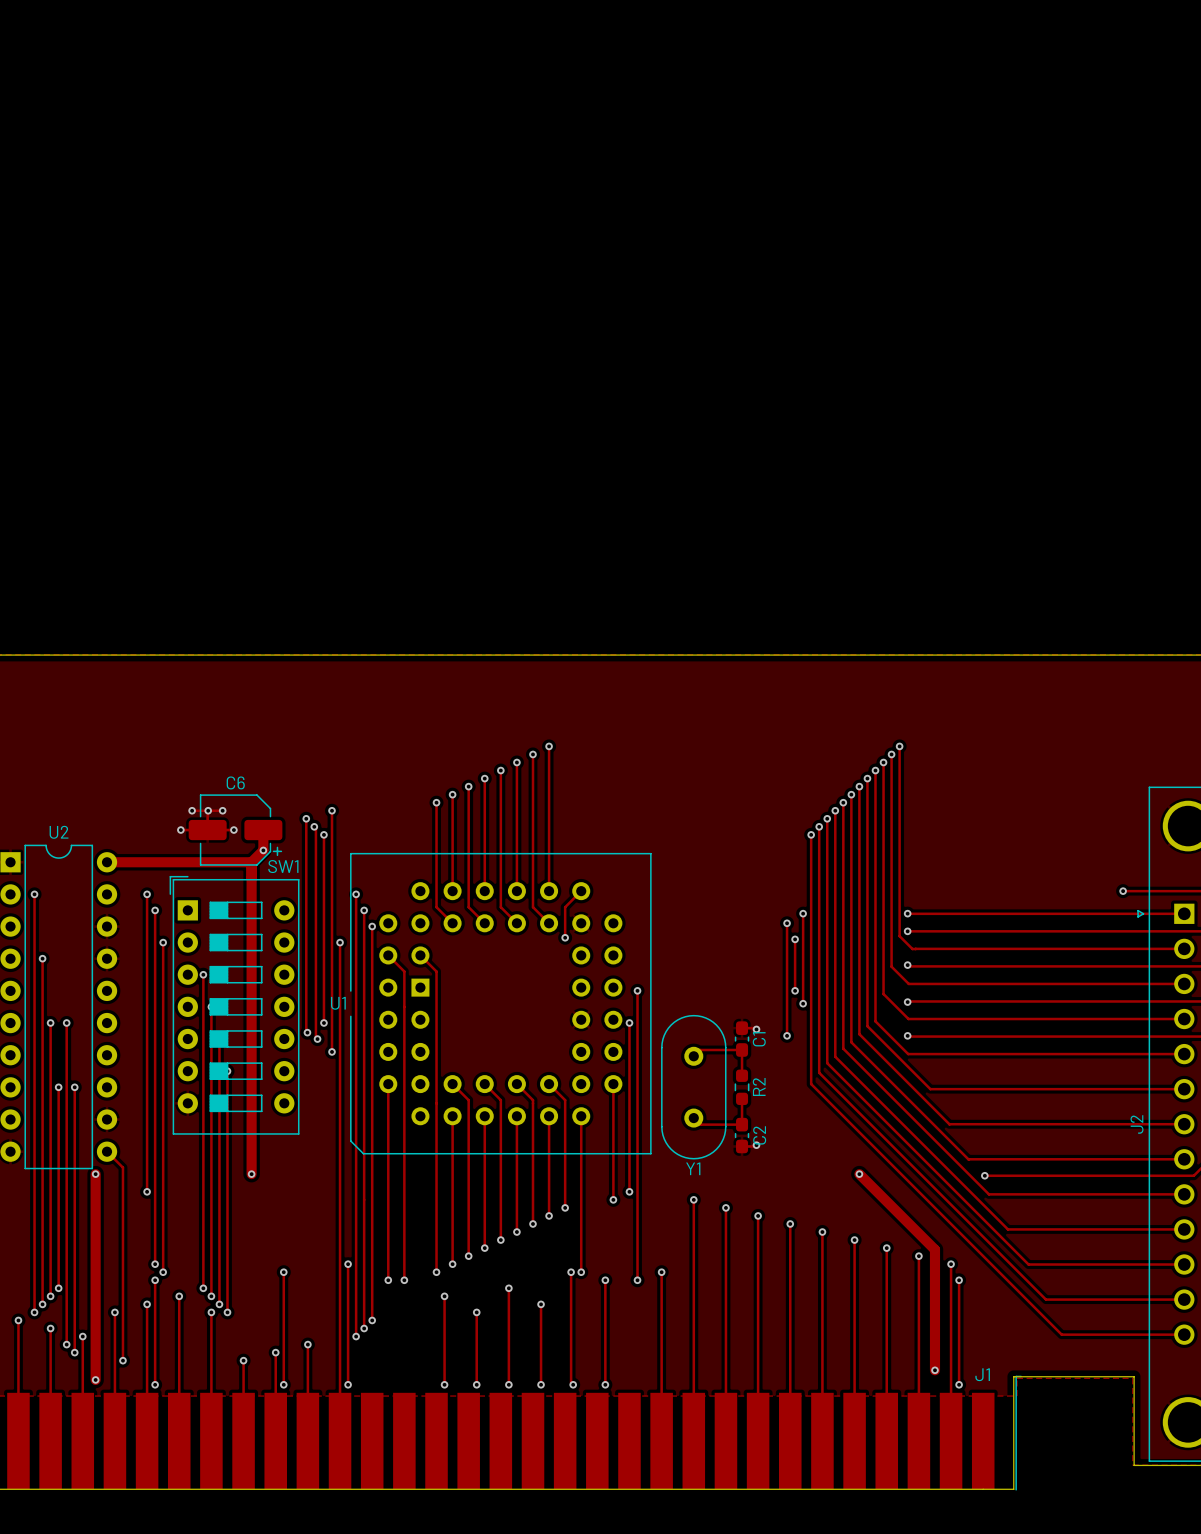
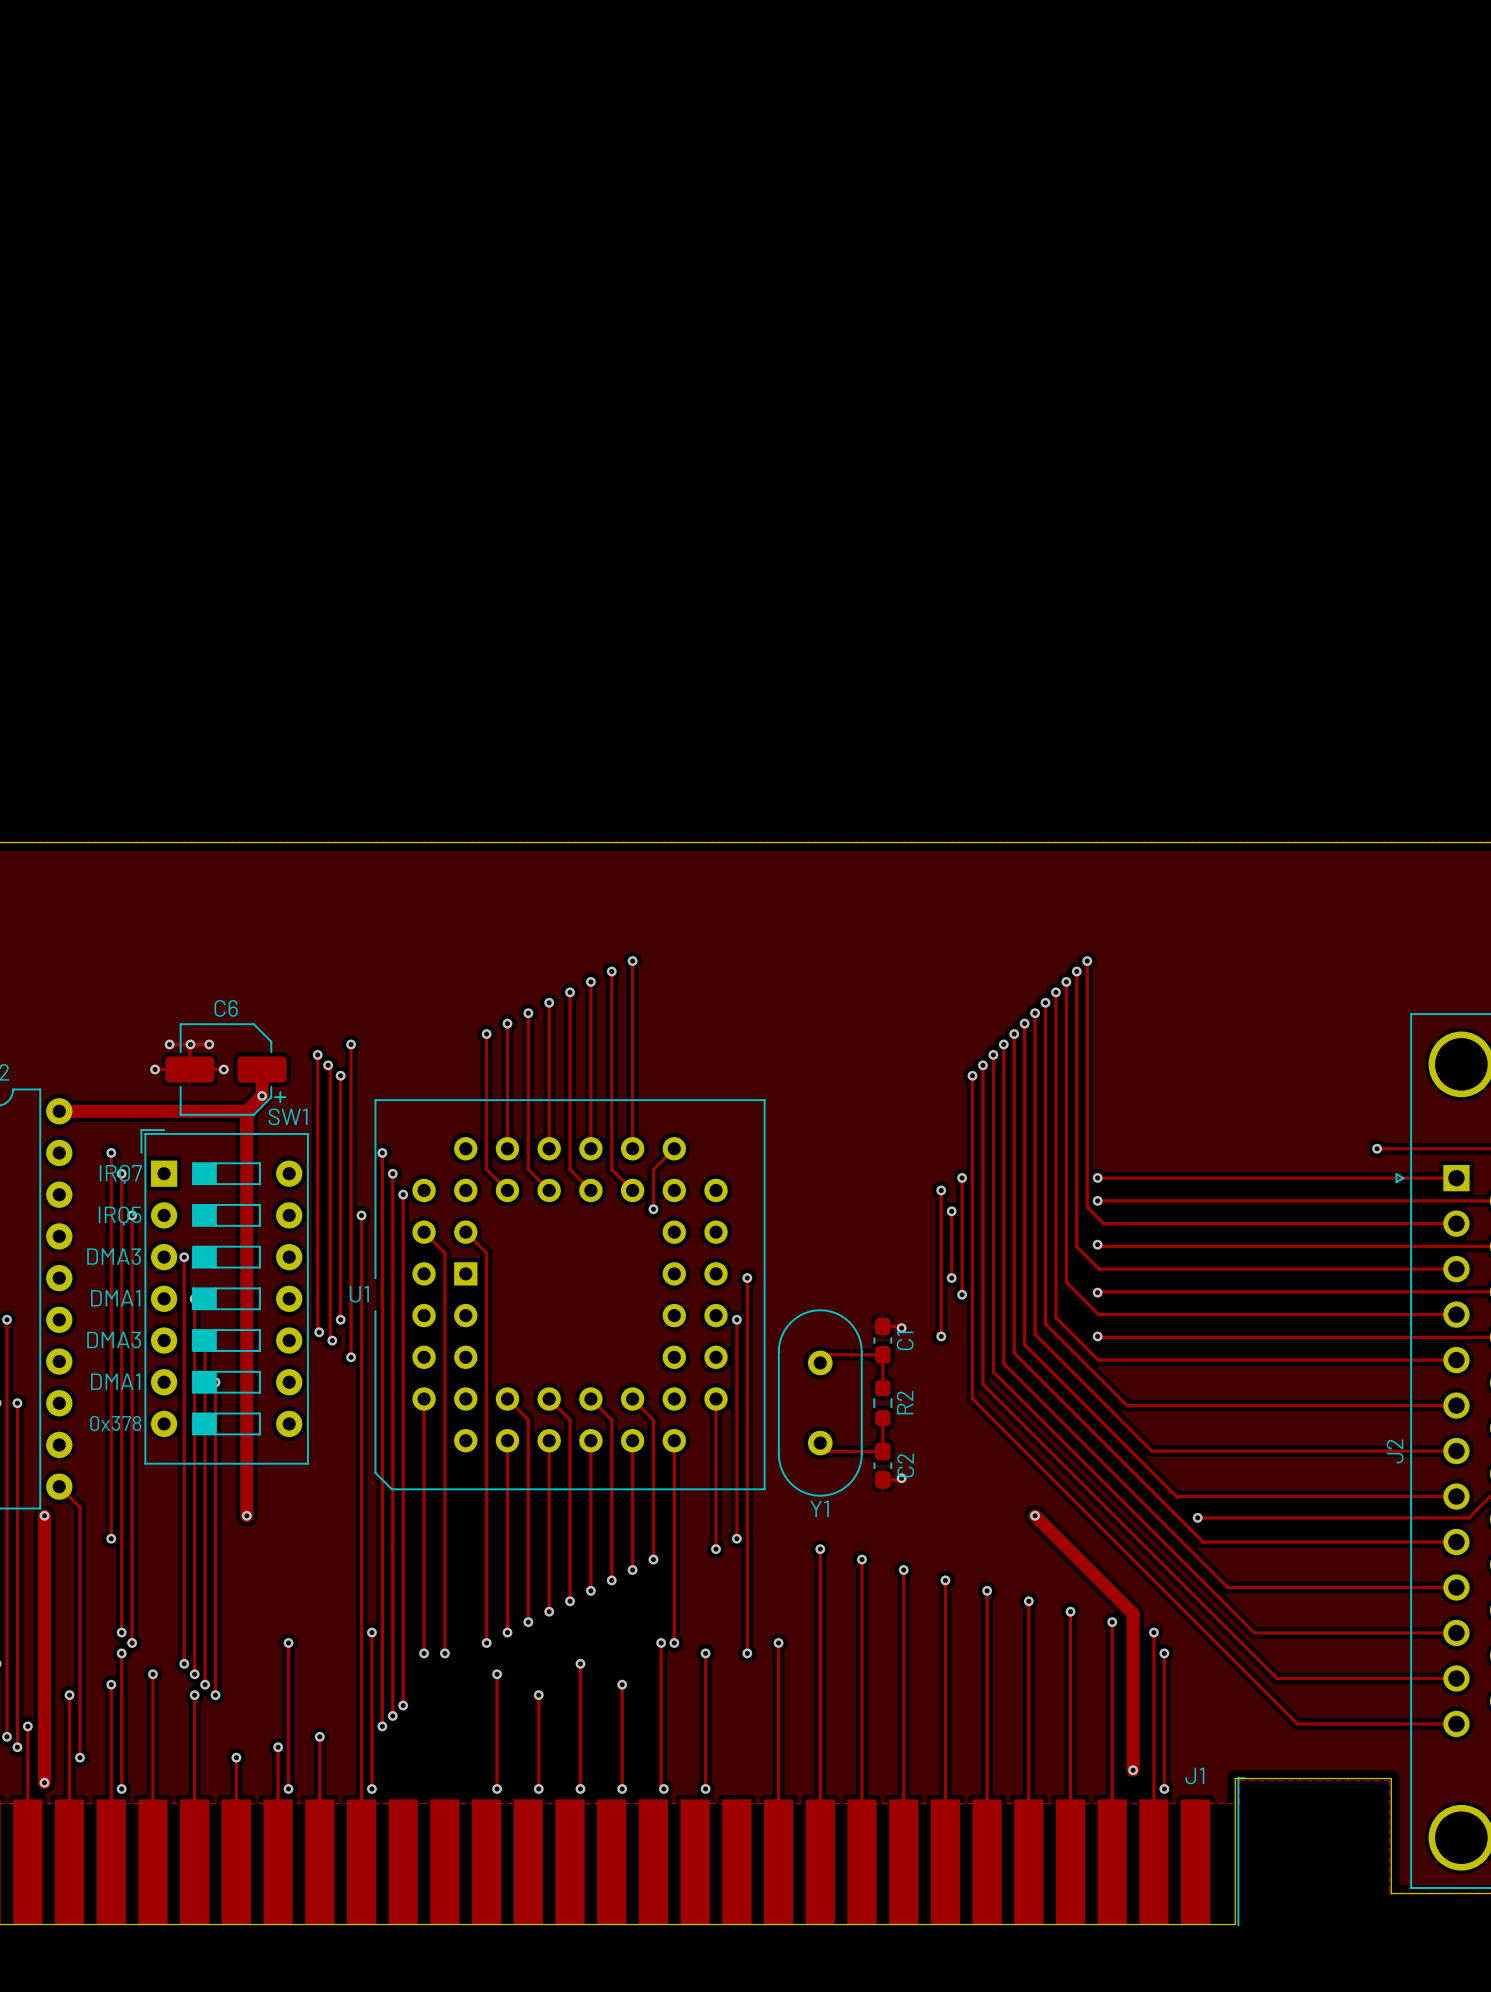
text: none -> IRQ7 (120, 1174)
text: none -> IRQ5 (120, 1216)
text: none -> DMA3 (114, 1256)
text: none -> DMA1 (115, 1298)
text: none -> DMA3 (114, 1340)
text: none -> DMA1 (115, 1381)
text: none -> 0x378 (115, 1423)

